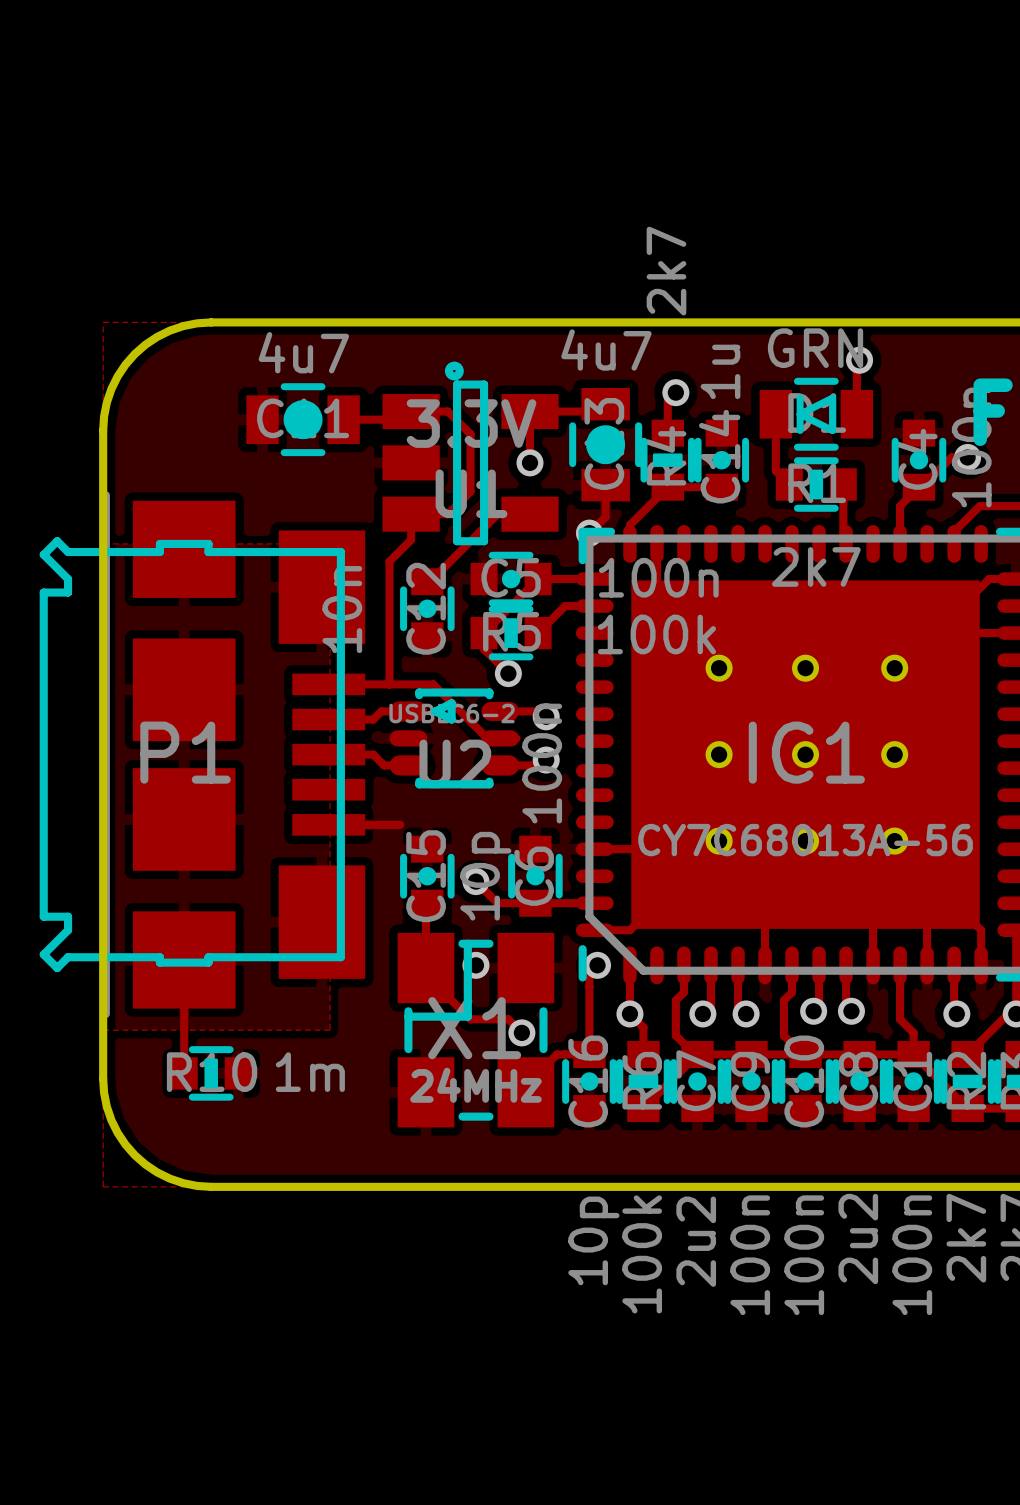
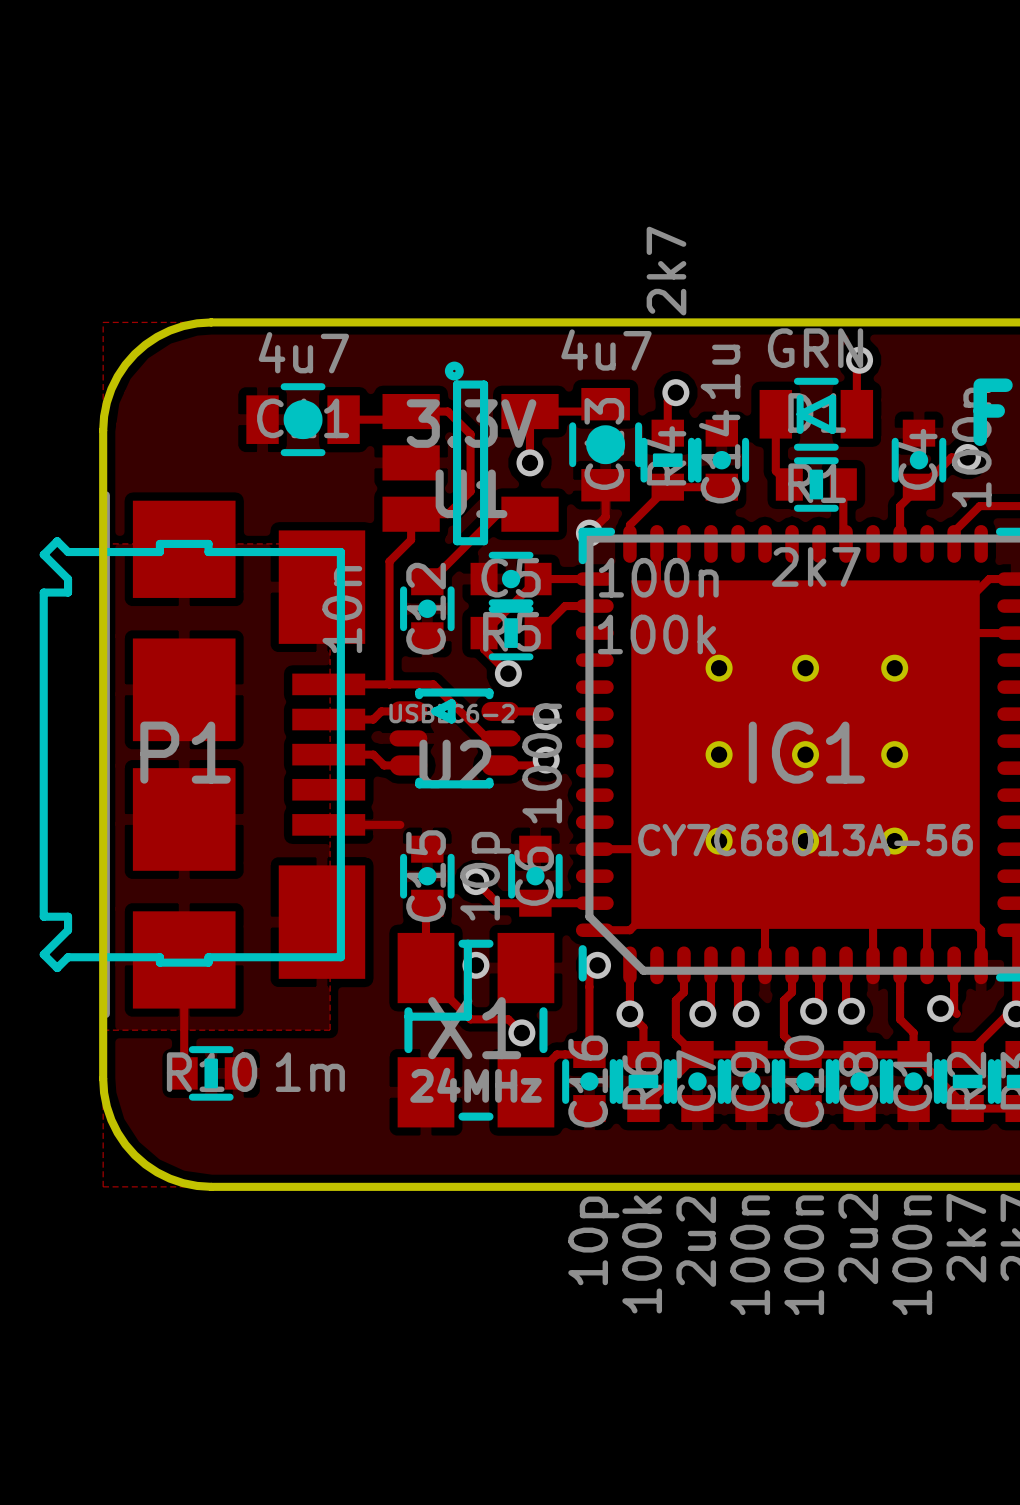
via position: (956, 1013) -> (940, 1008)

